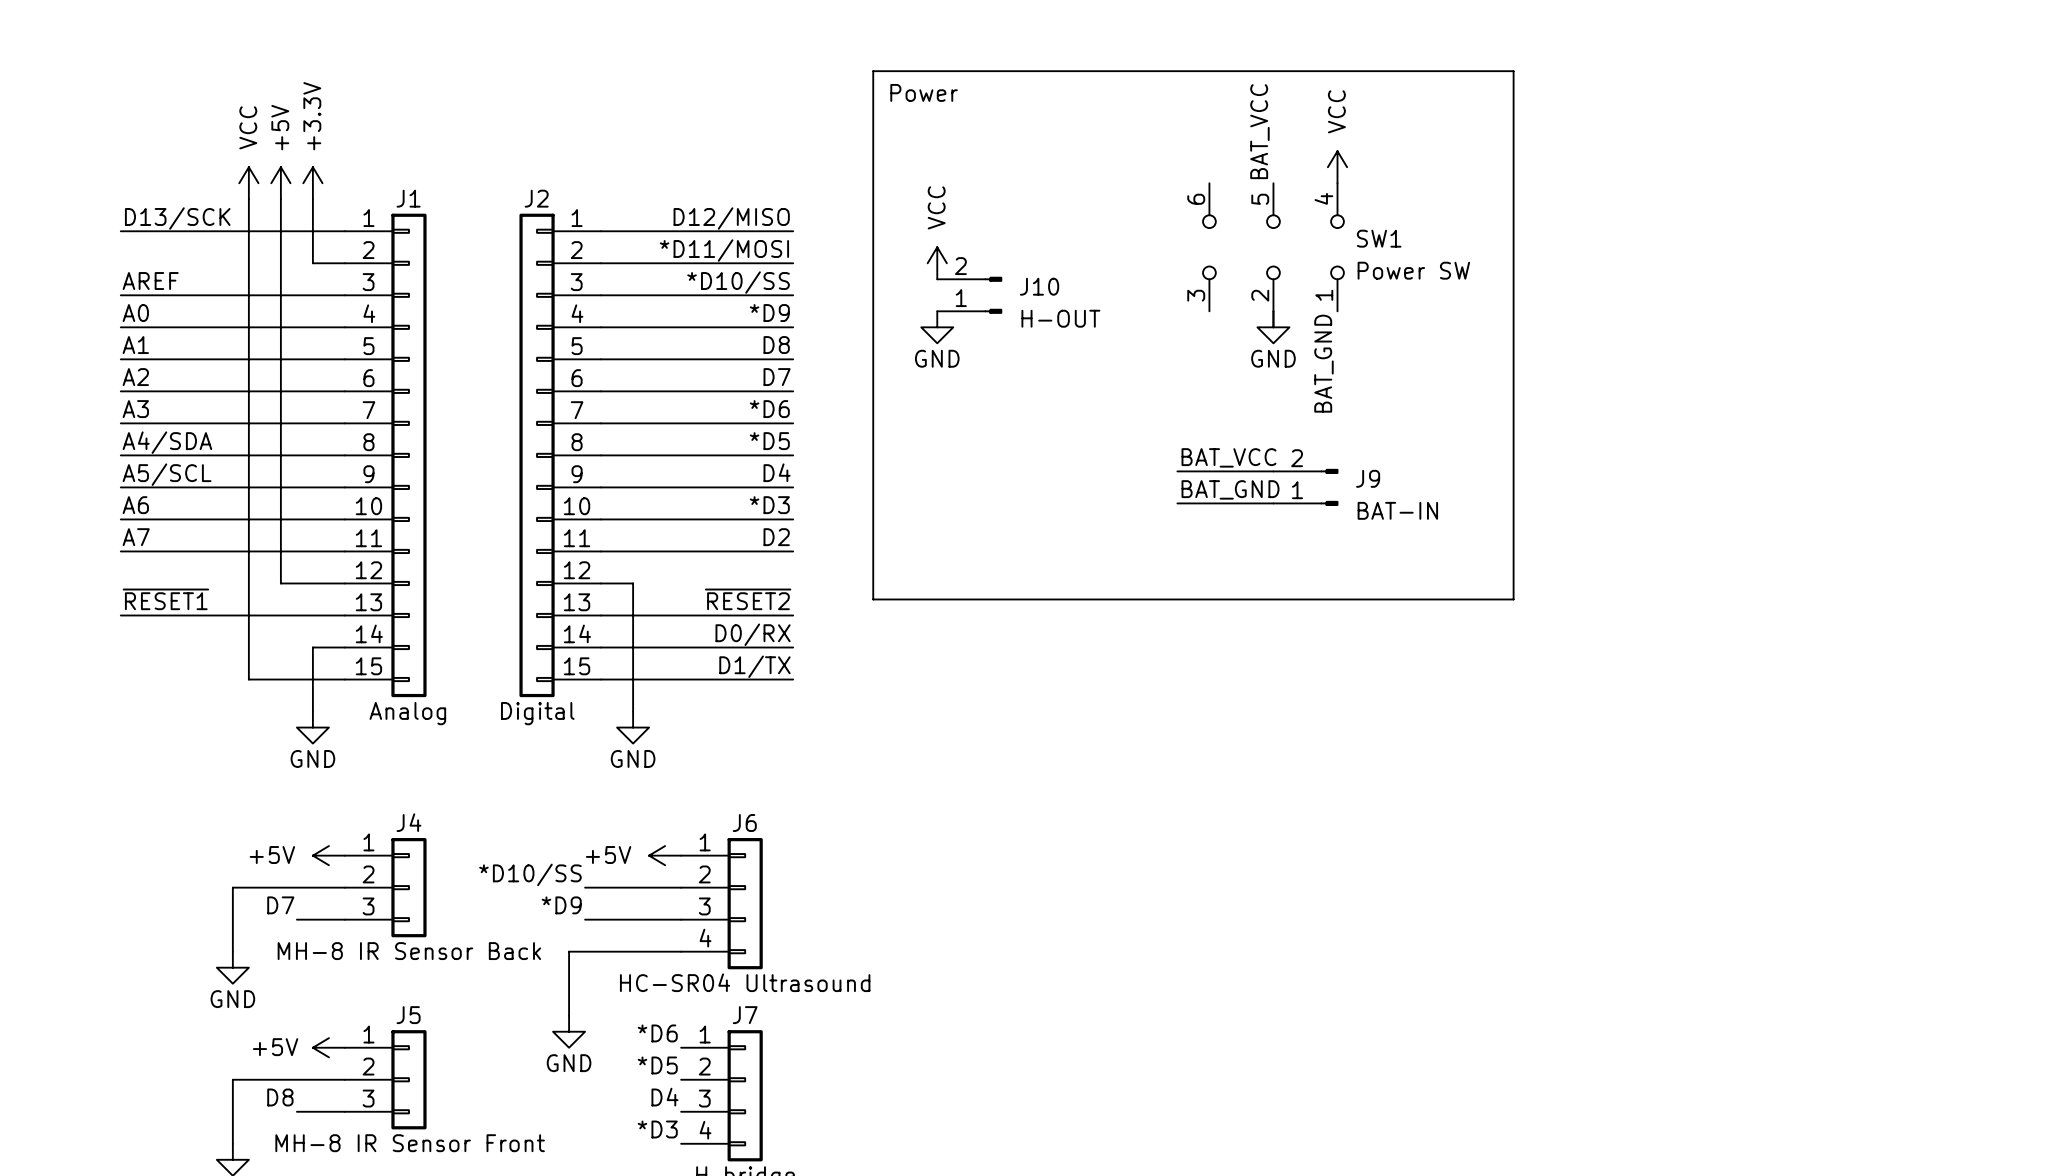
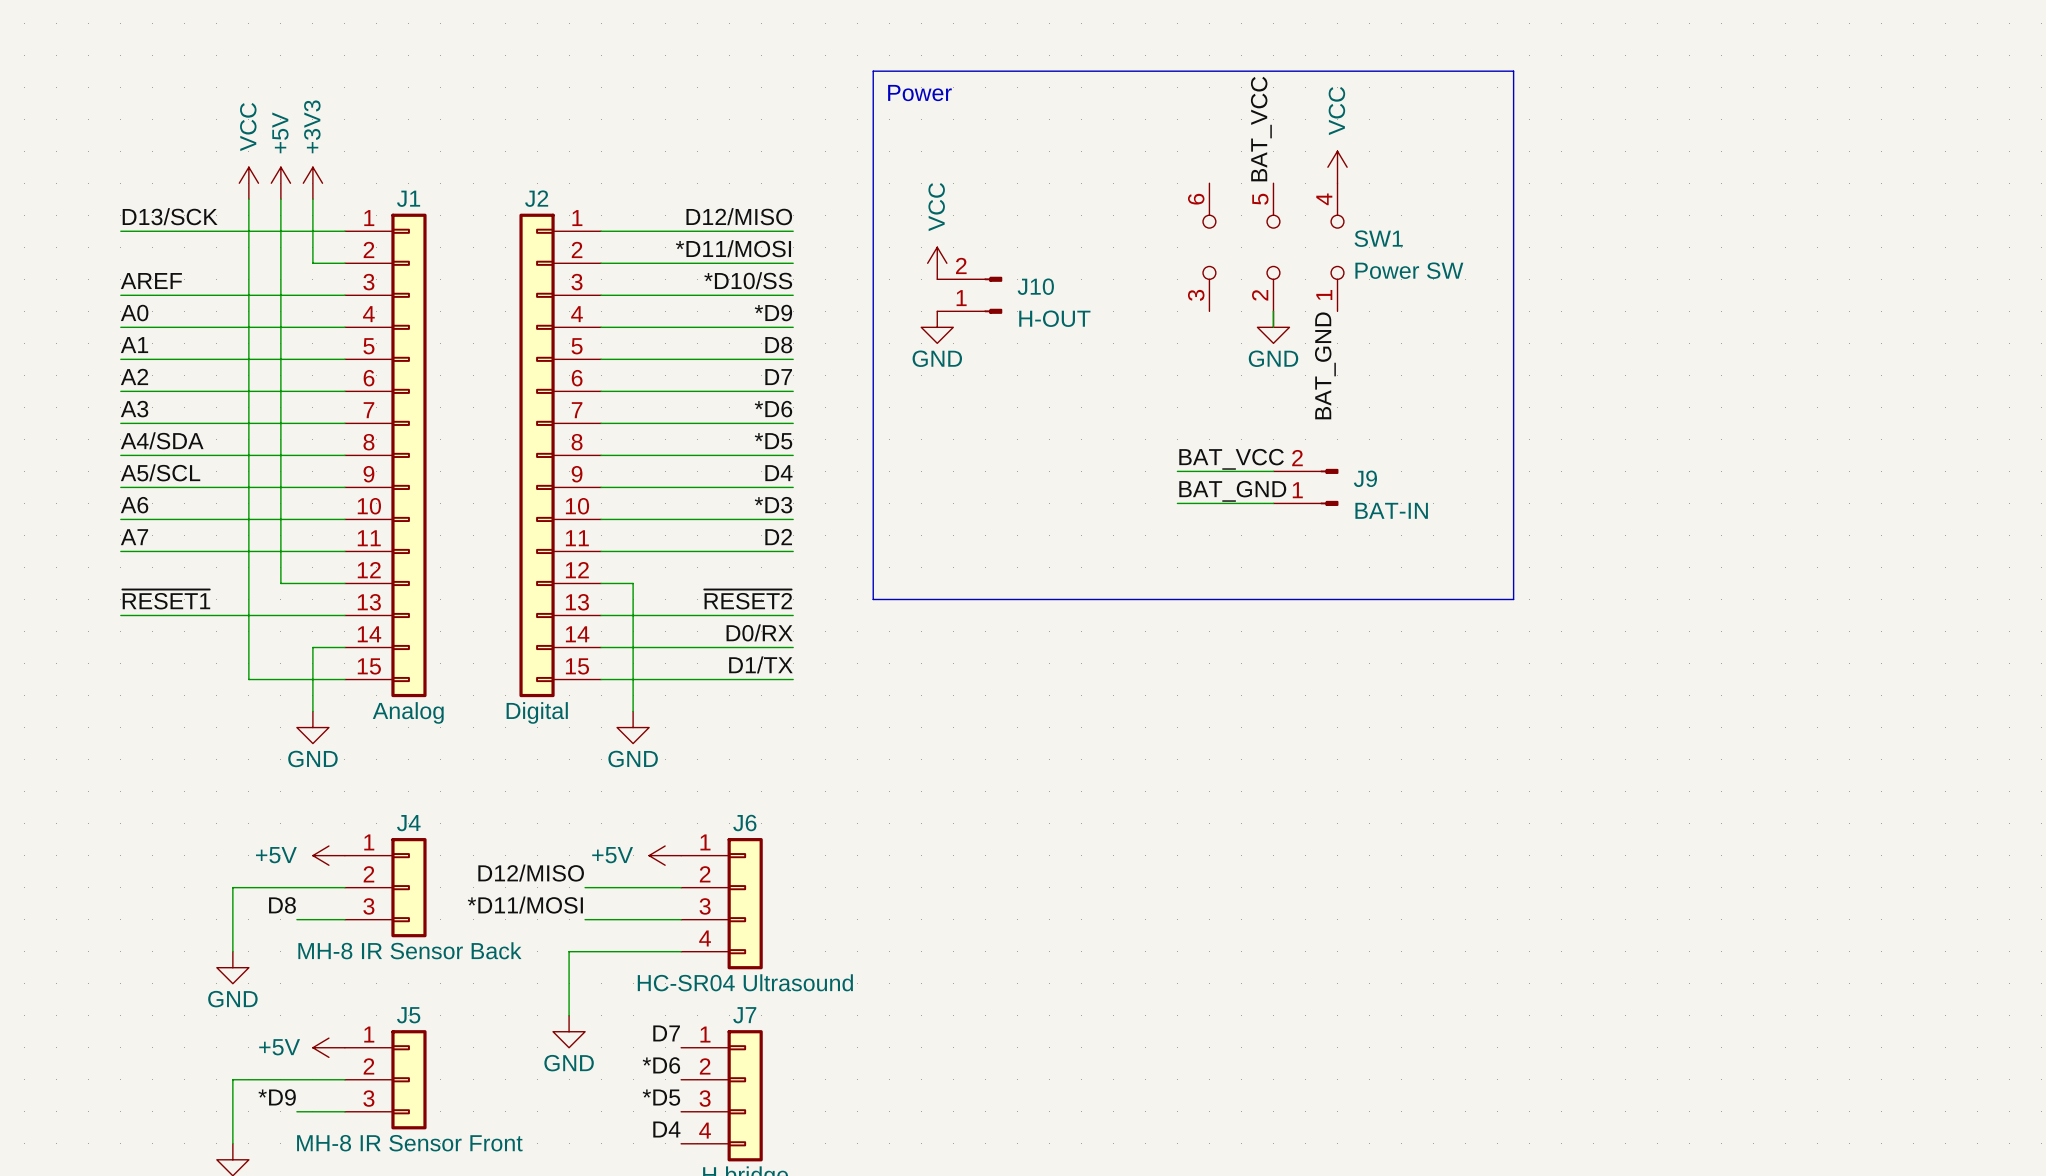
power symbol: +3.3V (312, 183) -> +3V3 (312, 183)
label: *D10/SS (530, 874) -> D12/MISO (531, 873)
label: D7 (280, 905) -> D8 (282, 905)
label: *D9 (561, 905) -> *D11/MOSI (525, 905)
label: *D6 (657, 1033) -> D7 (666, 1033)
label: *D5 (657, 1065) -> *D6 (661, 1065)
label: D8 (280, 1097) -> *D9 (277, 1097)
label: D4 (665, 1097) -> *D5 (661, 1097)
label: *D3 (657, 1129) -> D4 (666, 1129)

